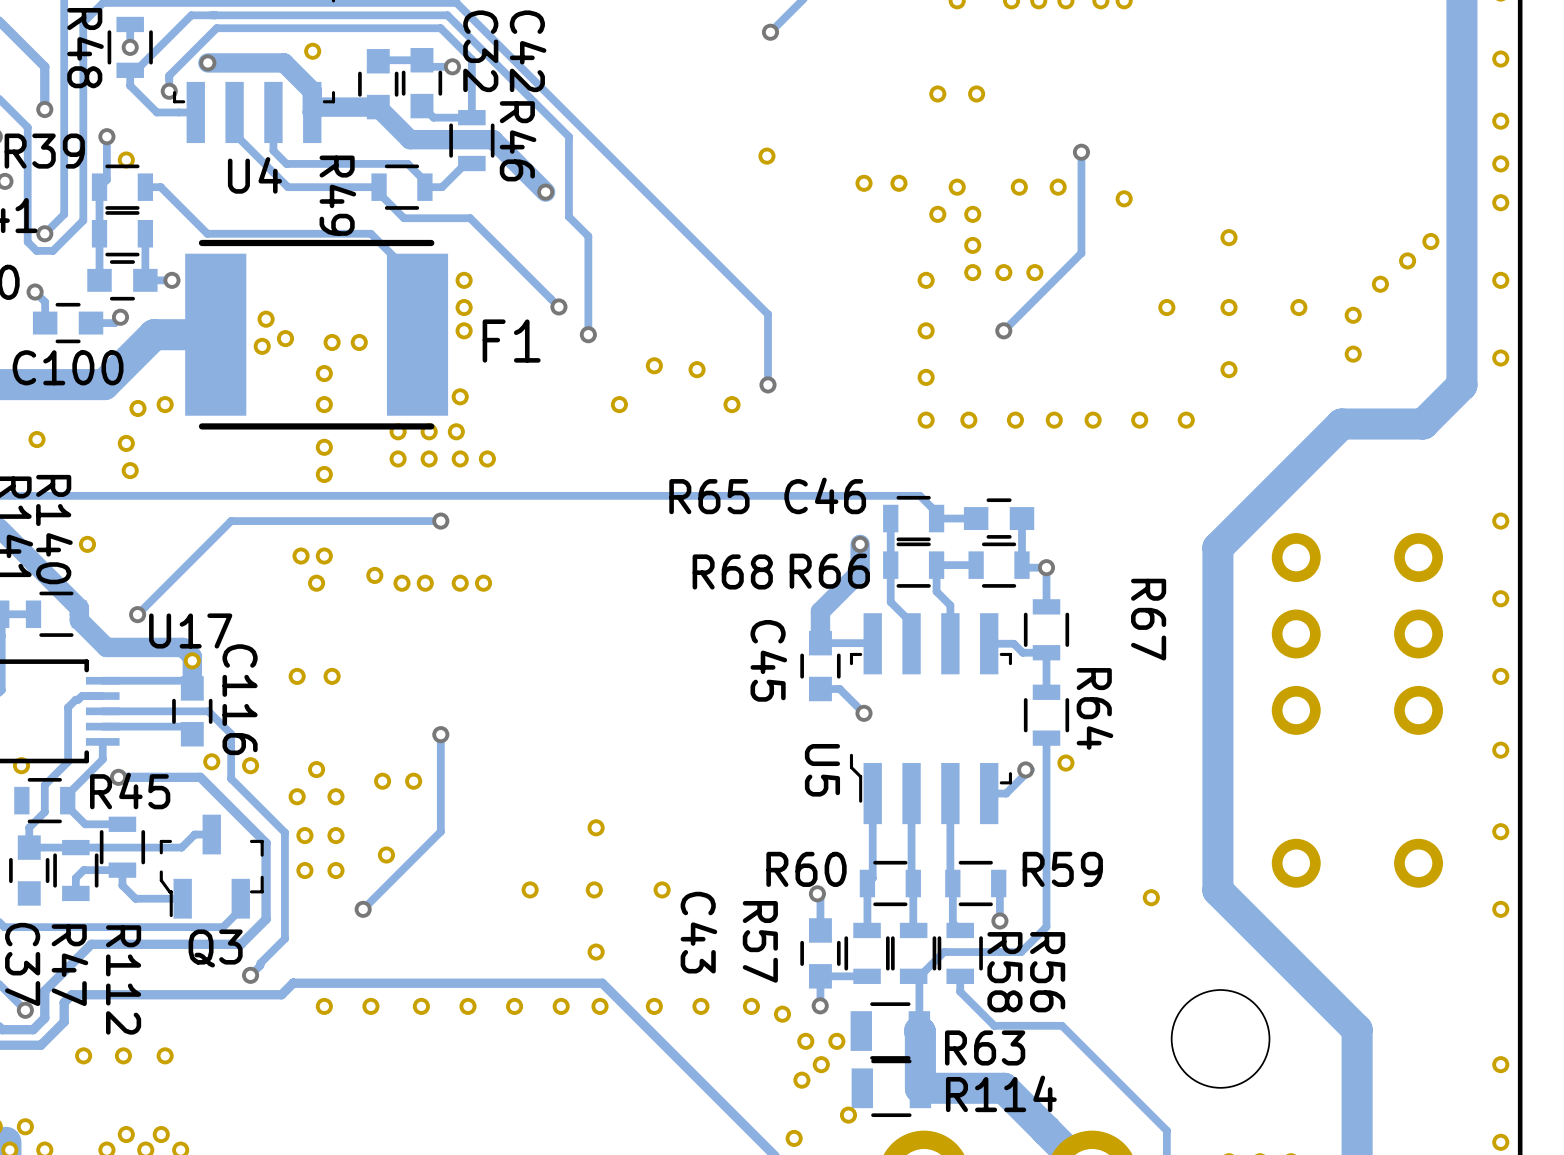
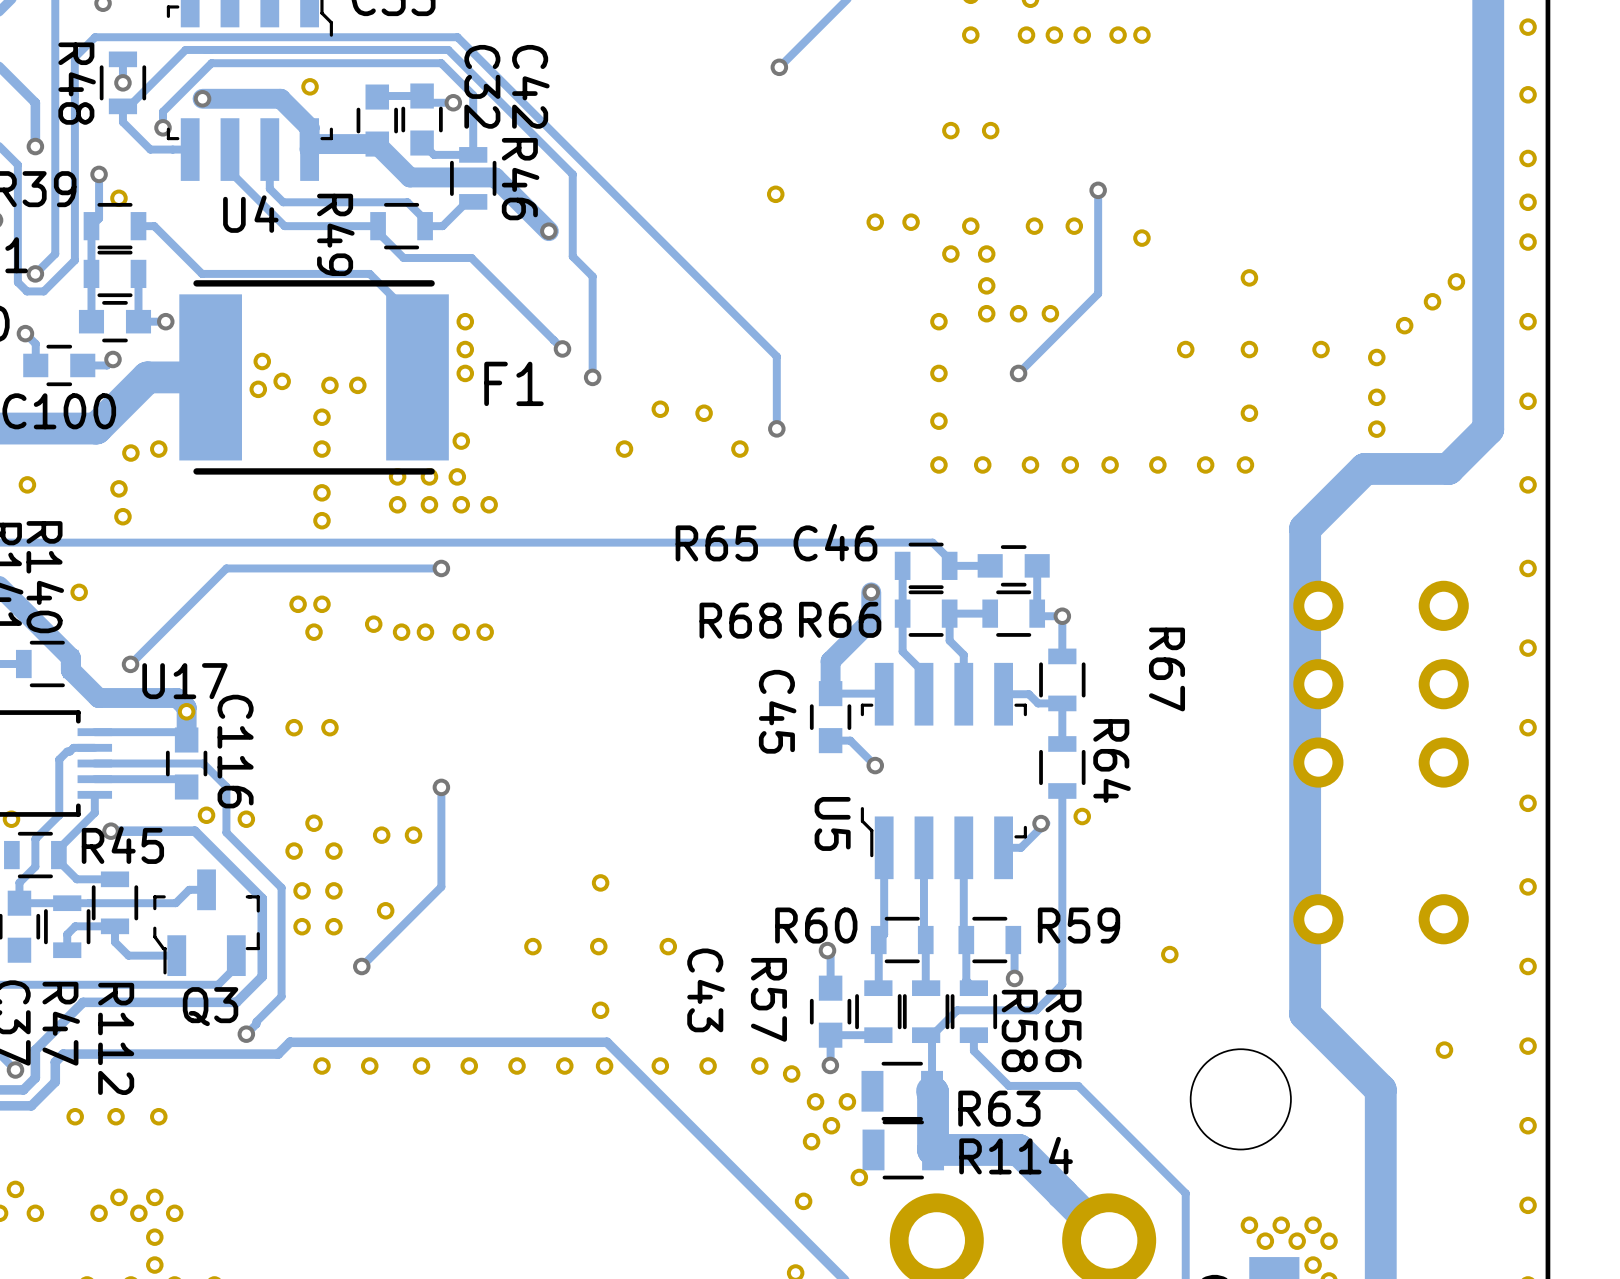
part: none -> (1376, 429)
part: none -> (1245, 464)
part: none -> (1528, 484)
track: (1283, 482) (1217, 547) (1217, 890) (1283, 955) -> (1305, 528) (1305, 1014)
part: none -> (1528, 1046)
part: none -> (1444, 1050)

